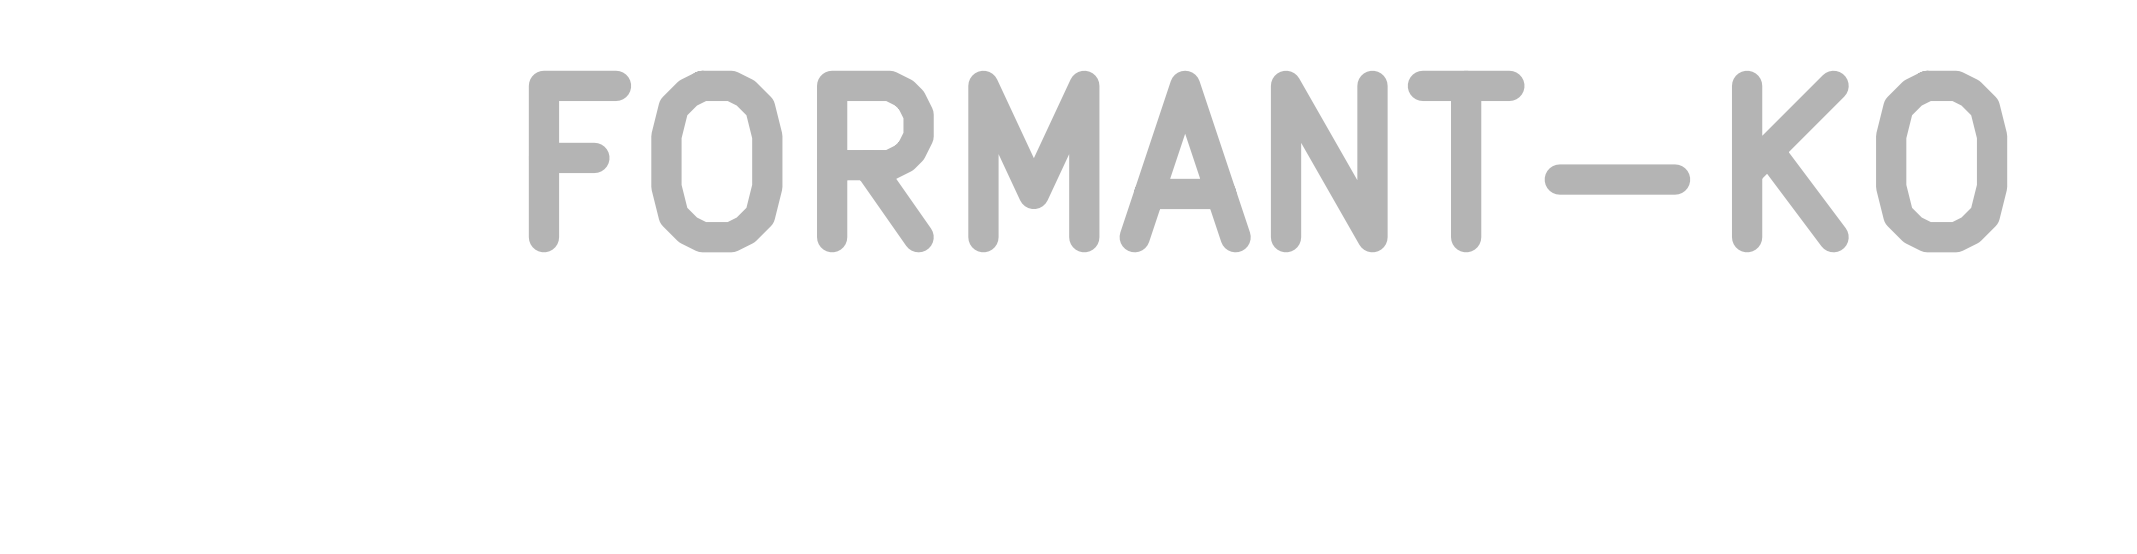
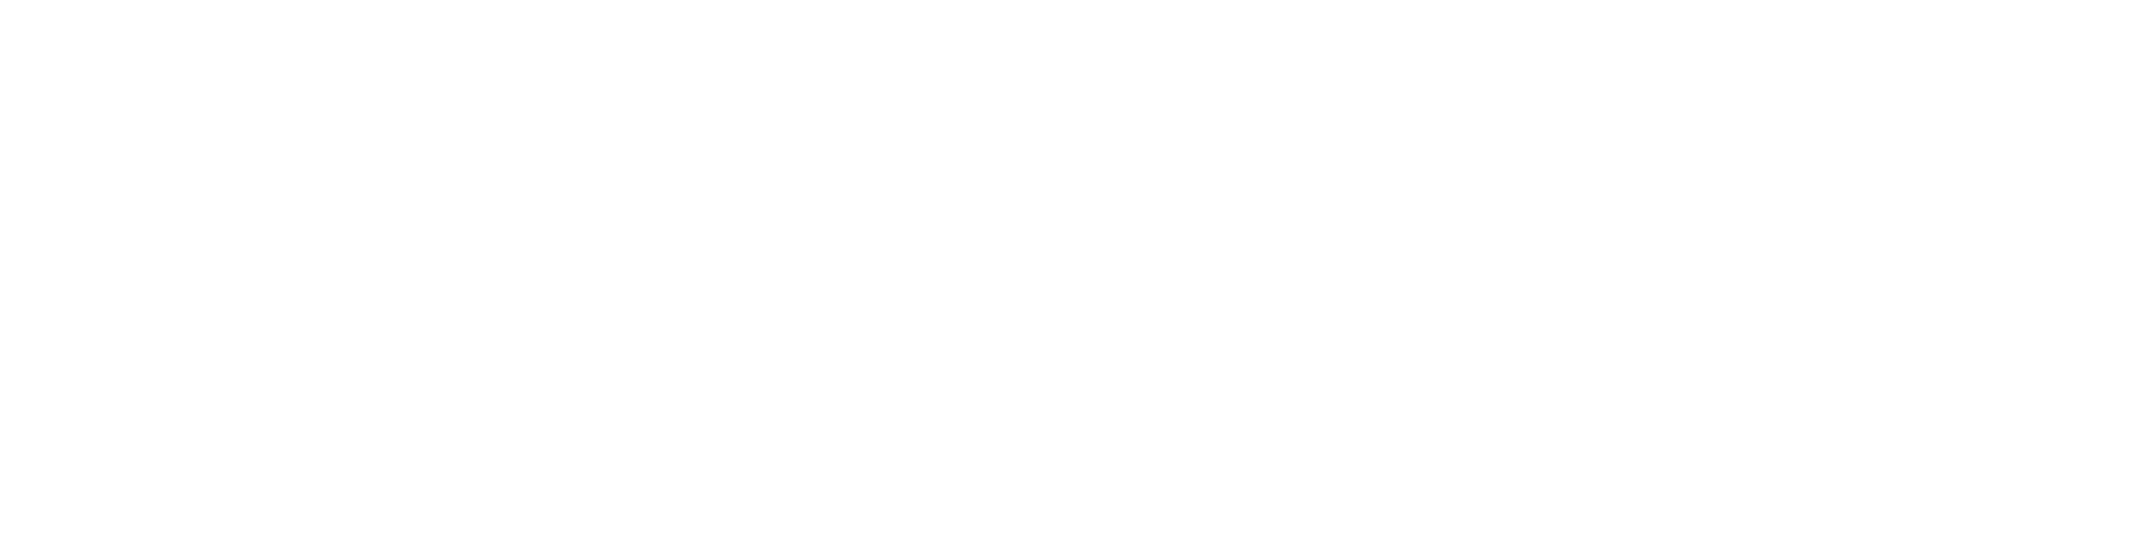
text: FORMANT-KO (1268, 161) -> none

